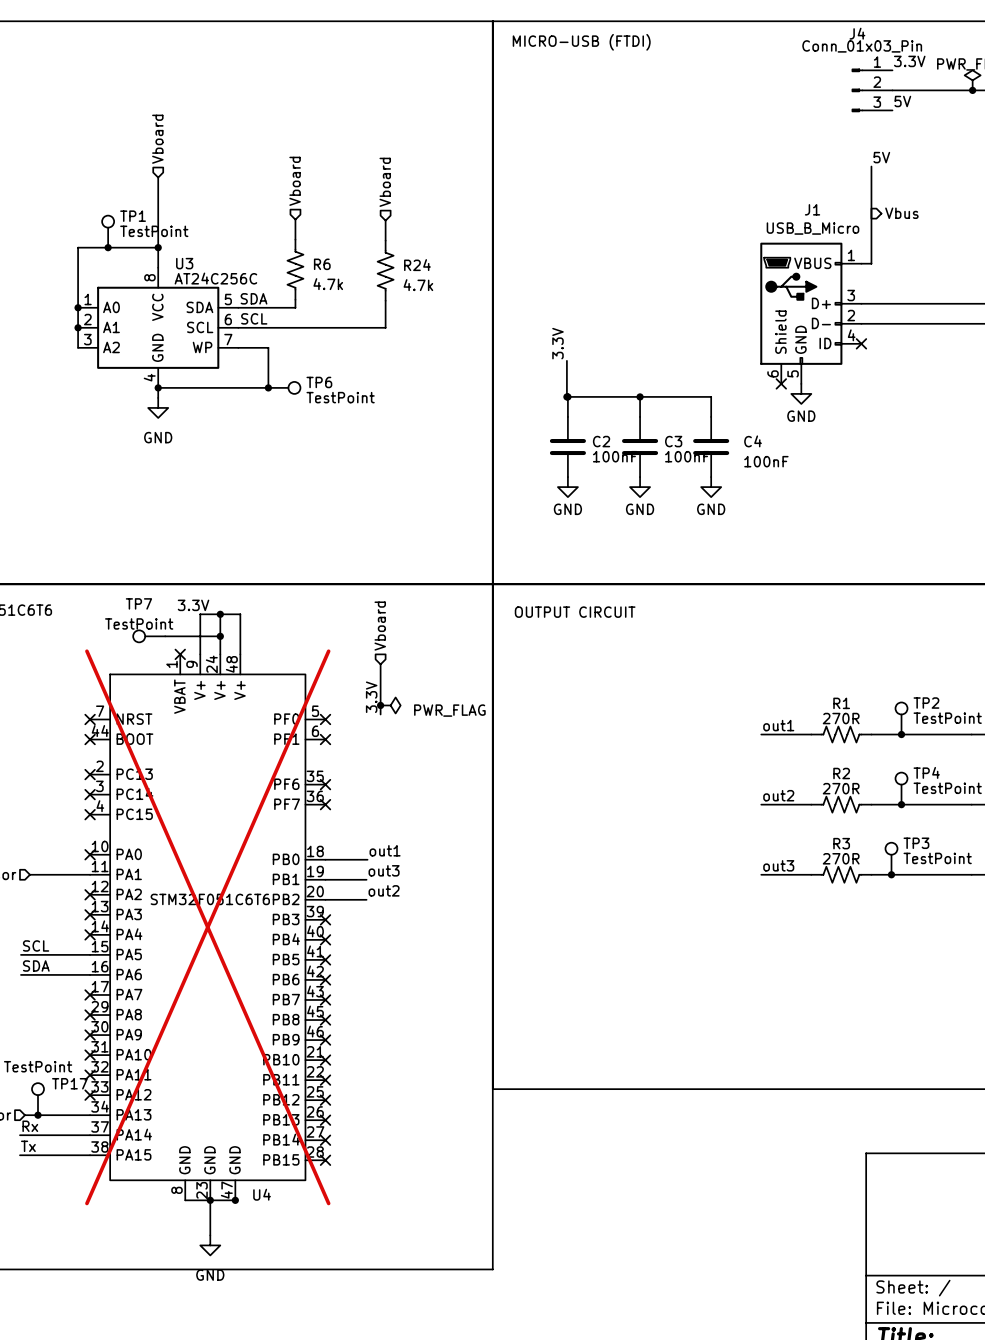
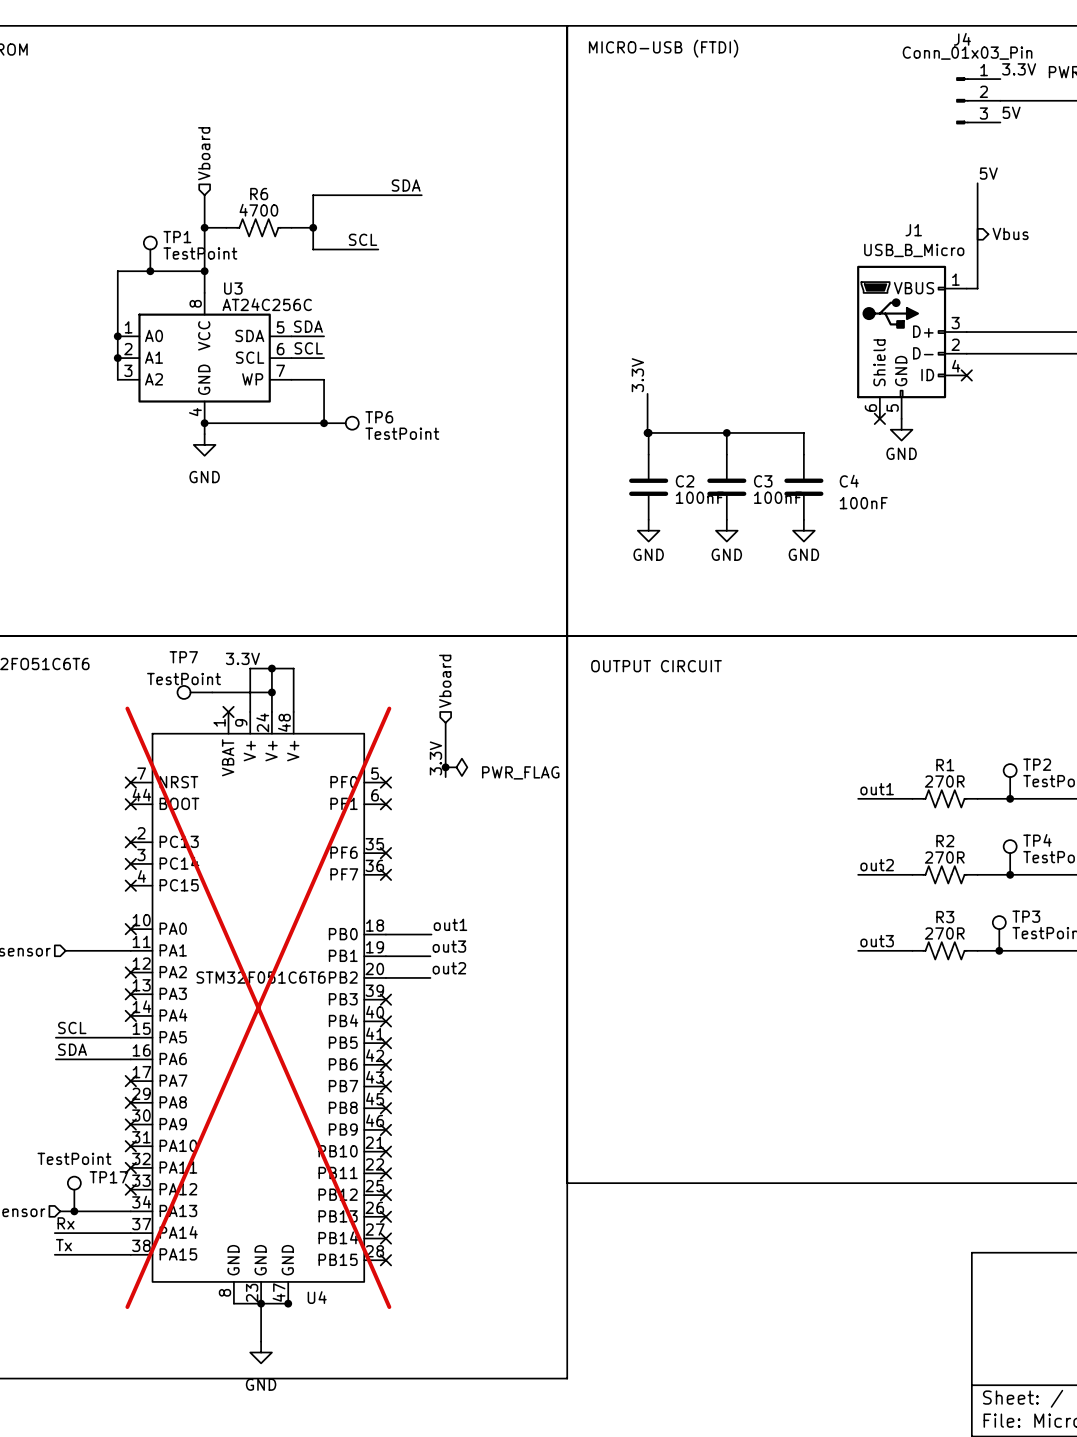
label: none -> SDA (406, 185)
wire: none -> (421, 195) (313, 195) (313, 249) (378, 249)
hierarchical label: Vboard (295, 181) -> none
hierarchical label: Vboard (385, 182) -> none
wire: none -> (204, 227) (226, 227)
junction: none -> (204, 227)
wire: none -> (291, 227) (313, 227)
junction: none -> (313, 227)
label: none -> SCL (363, 239)
wire: (295, 219) (295, 239) -> none
wire: (385, 220) (385, 240) -> none
R6 name position: R6 (322, 264) -> R6 (259, 194)
R6 rotation: 0° (295, 269) -> 90° clockwise (258, 227)
R6 position: (295, 269) -> (258, 227)
R24: 4.7k (385, 270) -> none
R6 value: 4.7k (328, 284) -> 4700 (258, 210)
wire: (295, 299) (295, 307) (268, 307) -> none
wire: (385, 300) (385, 327) (268, 327) -> none

